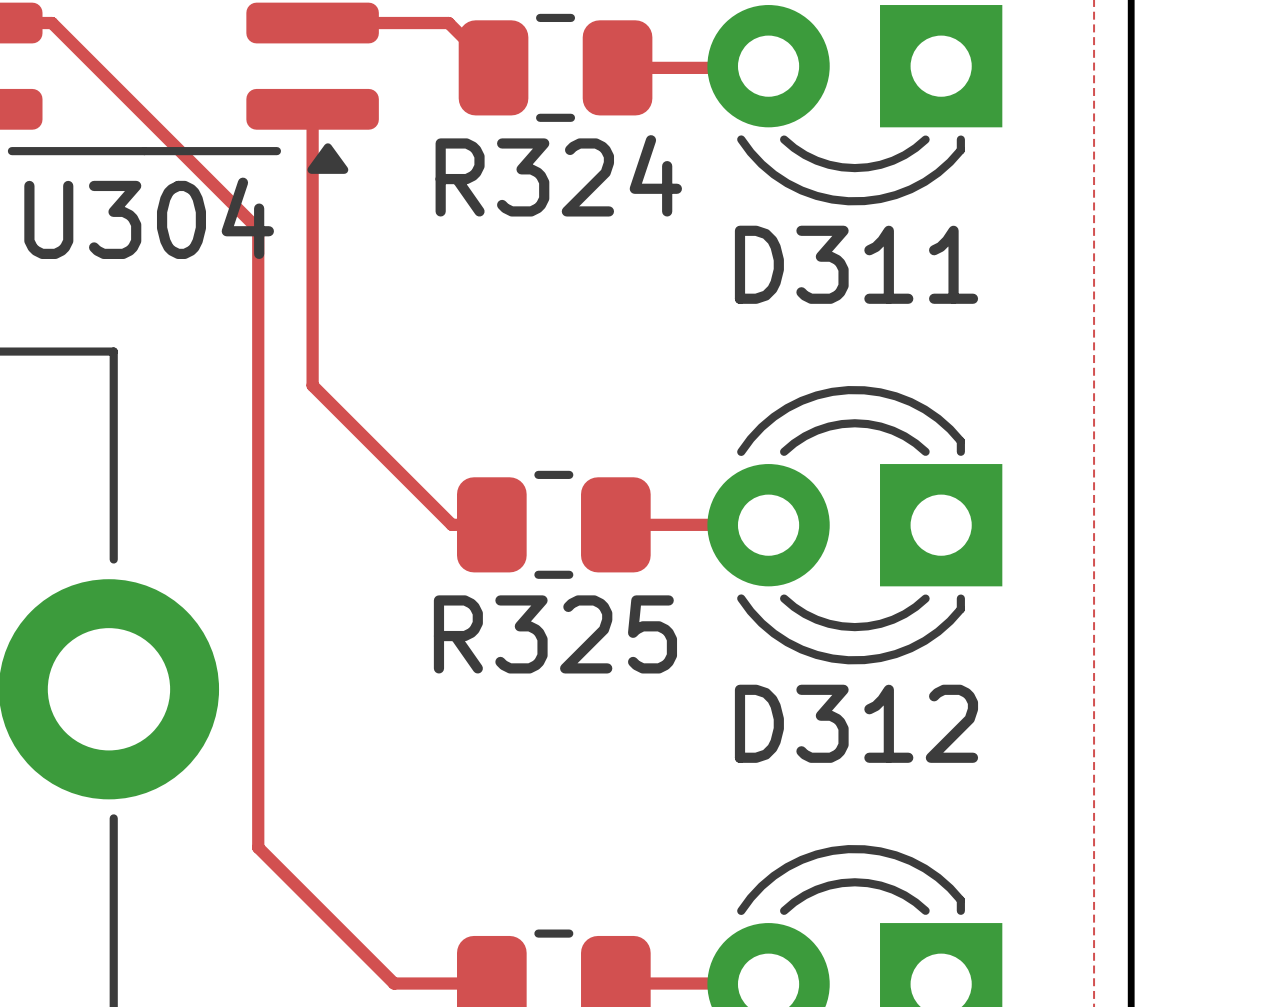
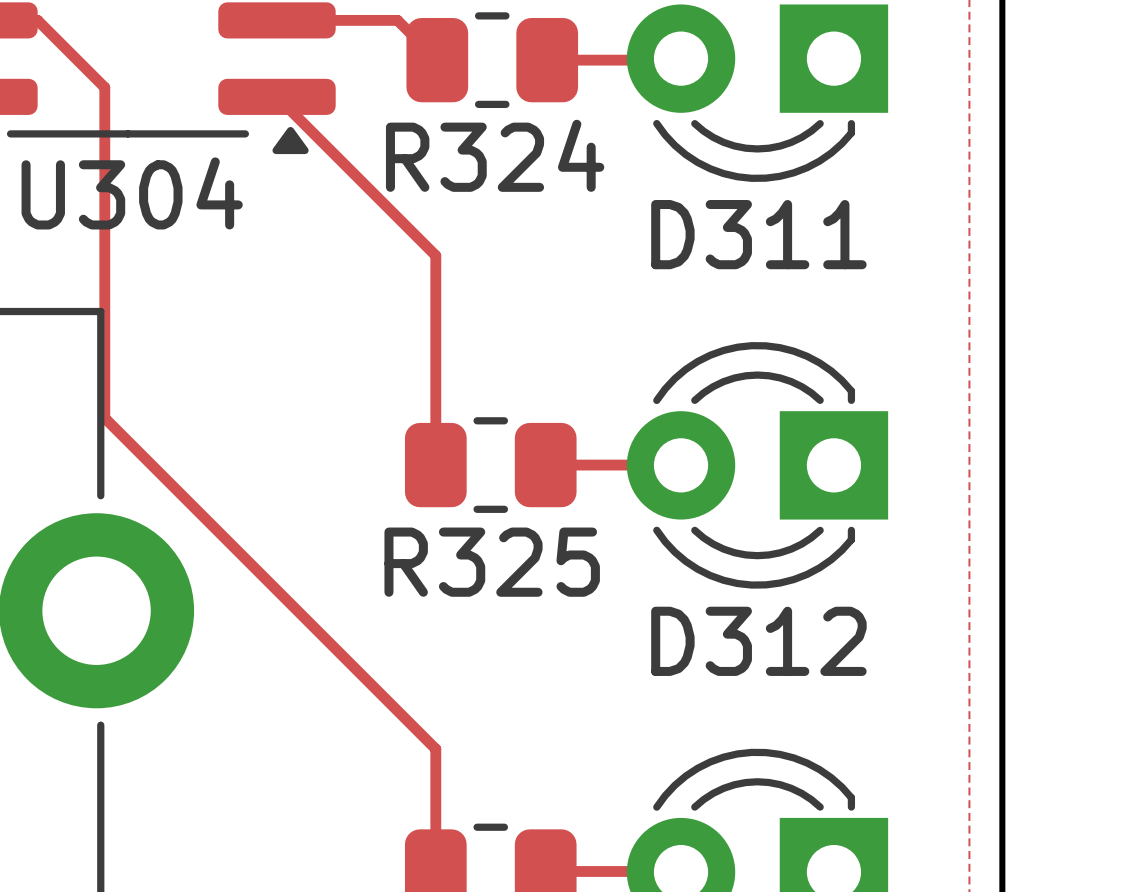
track: (42, 23) (52, 23) (258, 229) (258, 847) (394, 983) (491, 983) -> (37, 20) (104, 87) (104, 418) (435, 749) (435, 871)
track: (312, 109) (312, 385) (451, 524) (491, 524) -> (277, 96) (435, 255) (435, 465)

